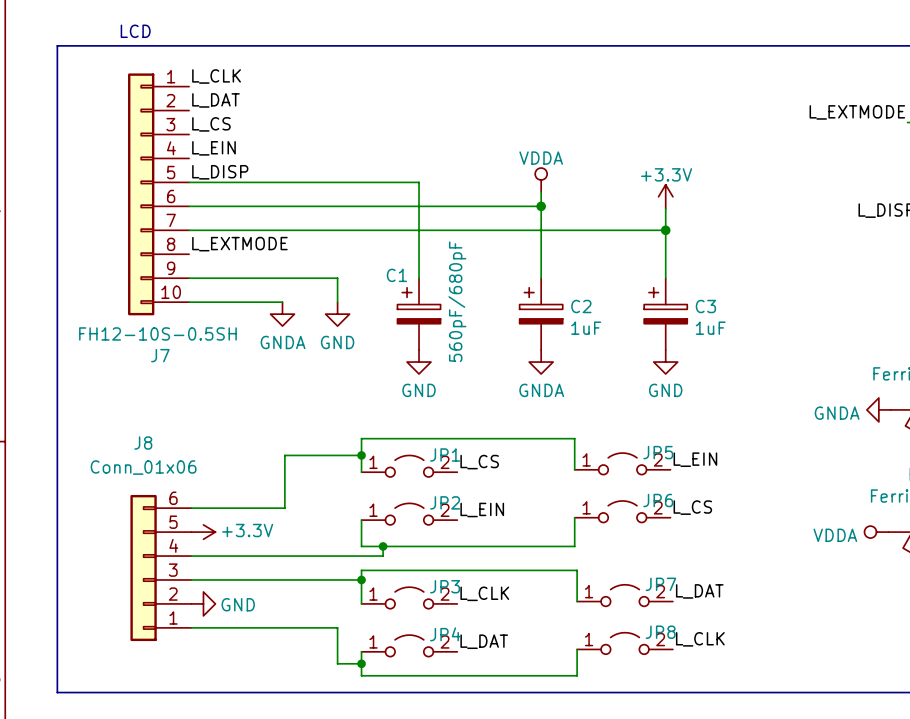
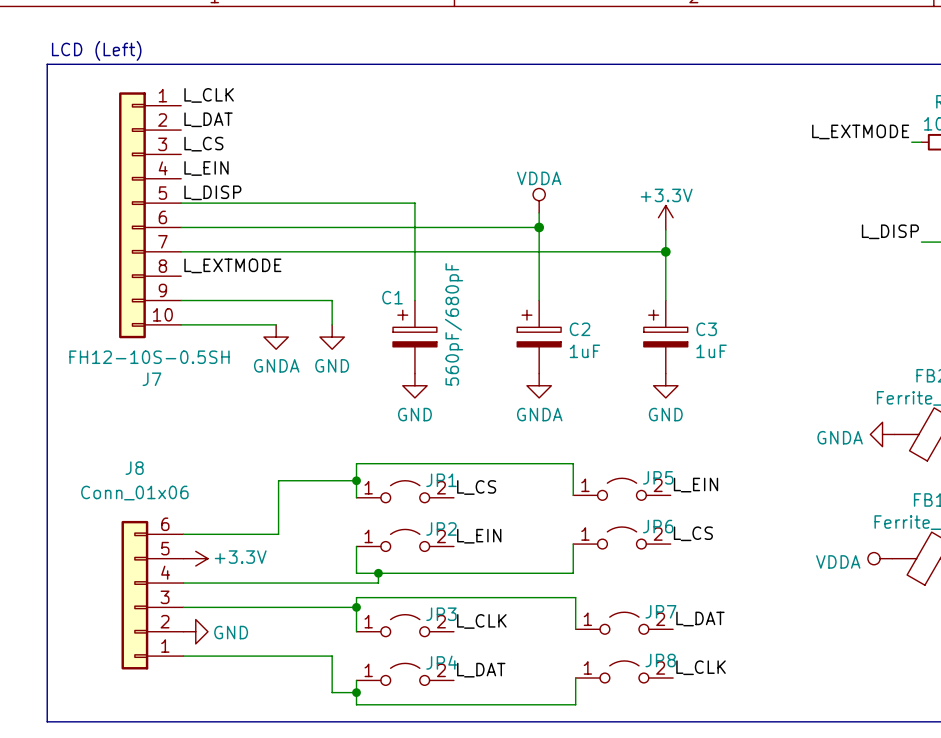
text: LCD (135, 31) -> LCD (Left) (96, 50)

